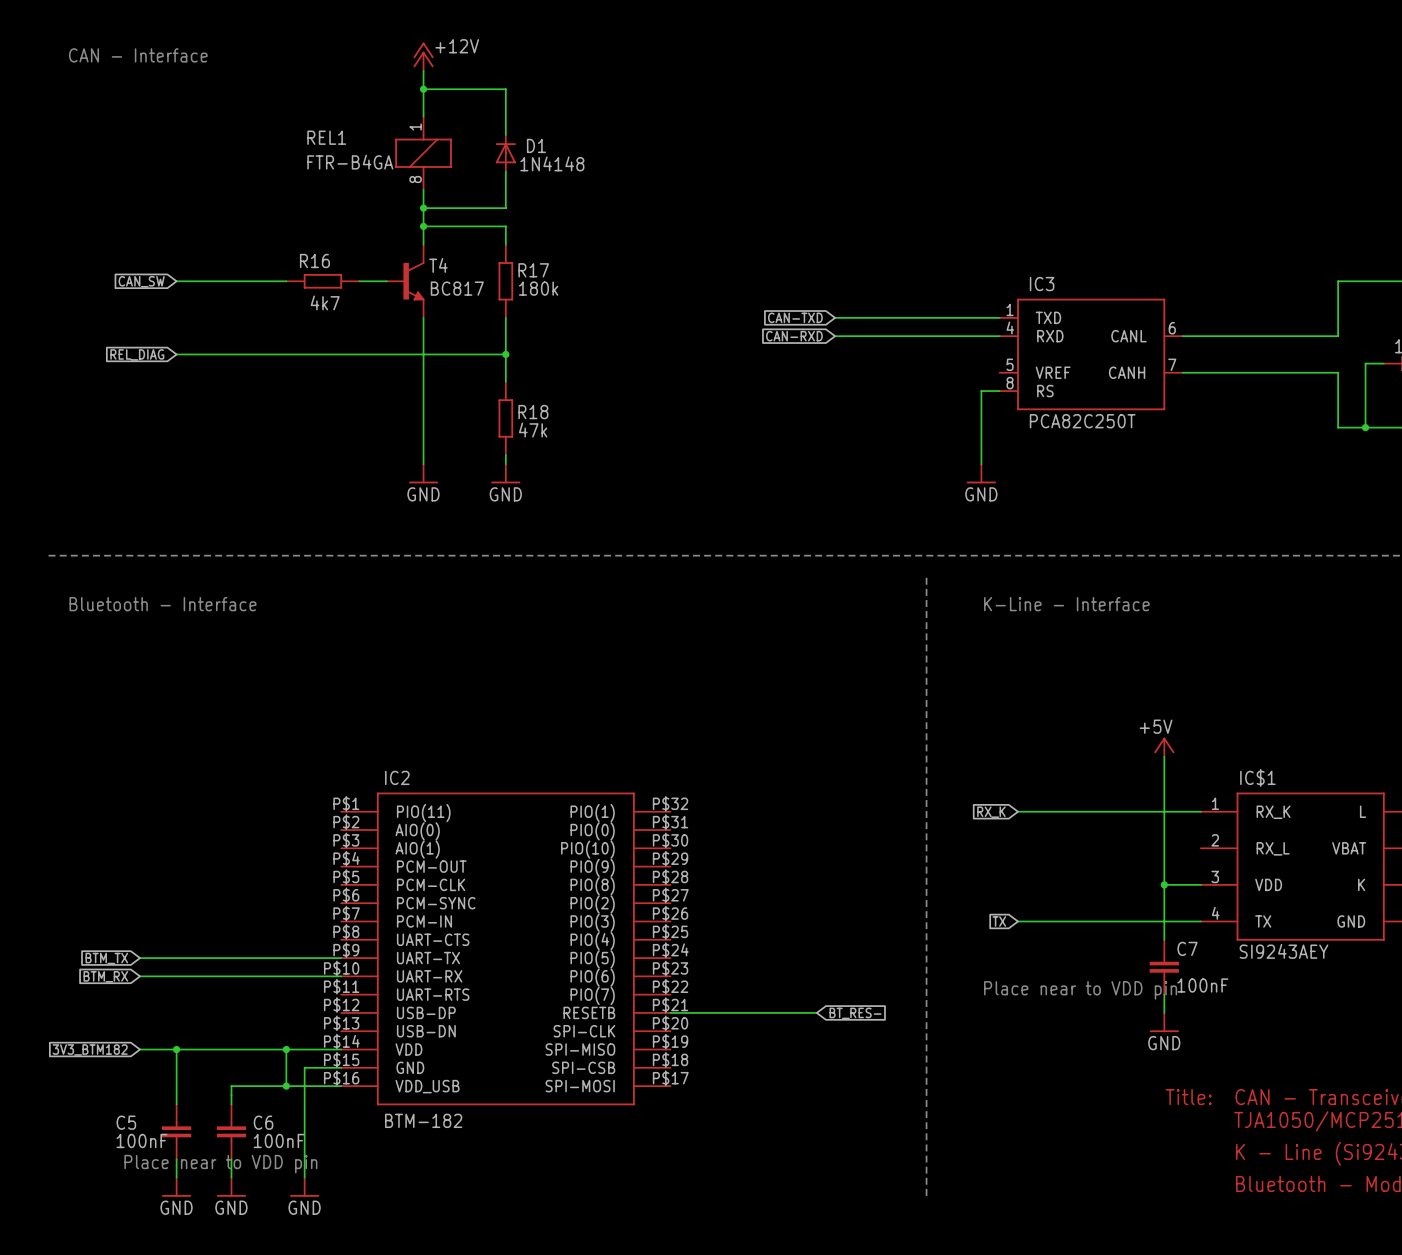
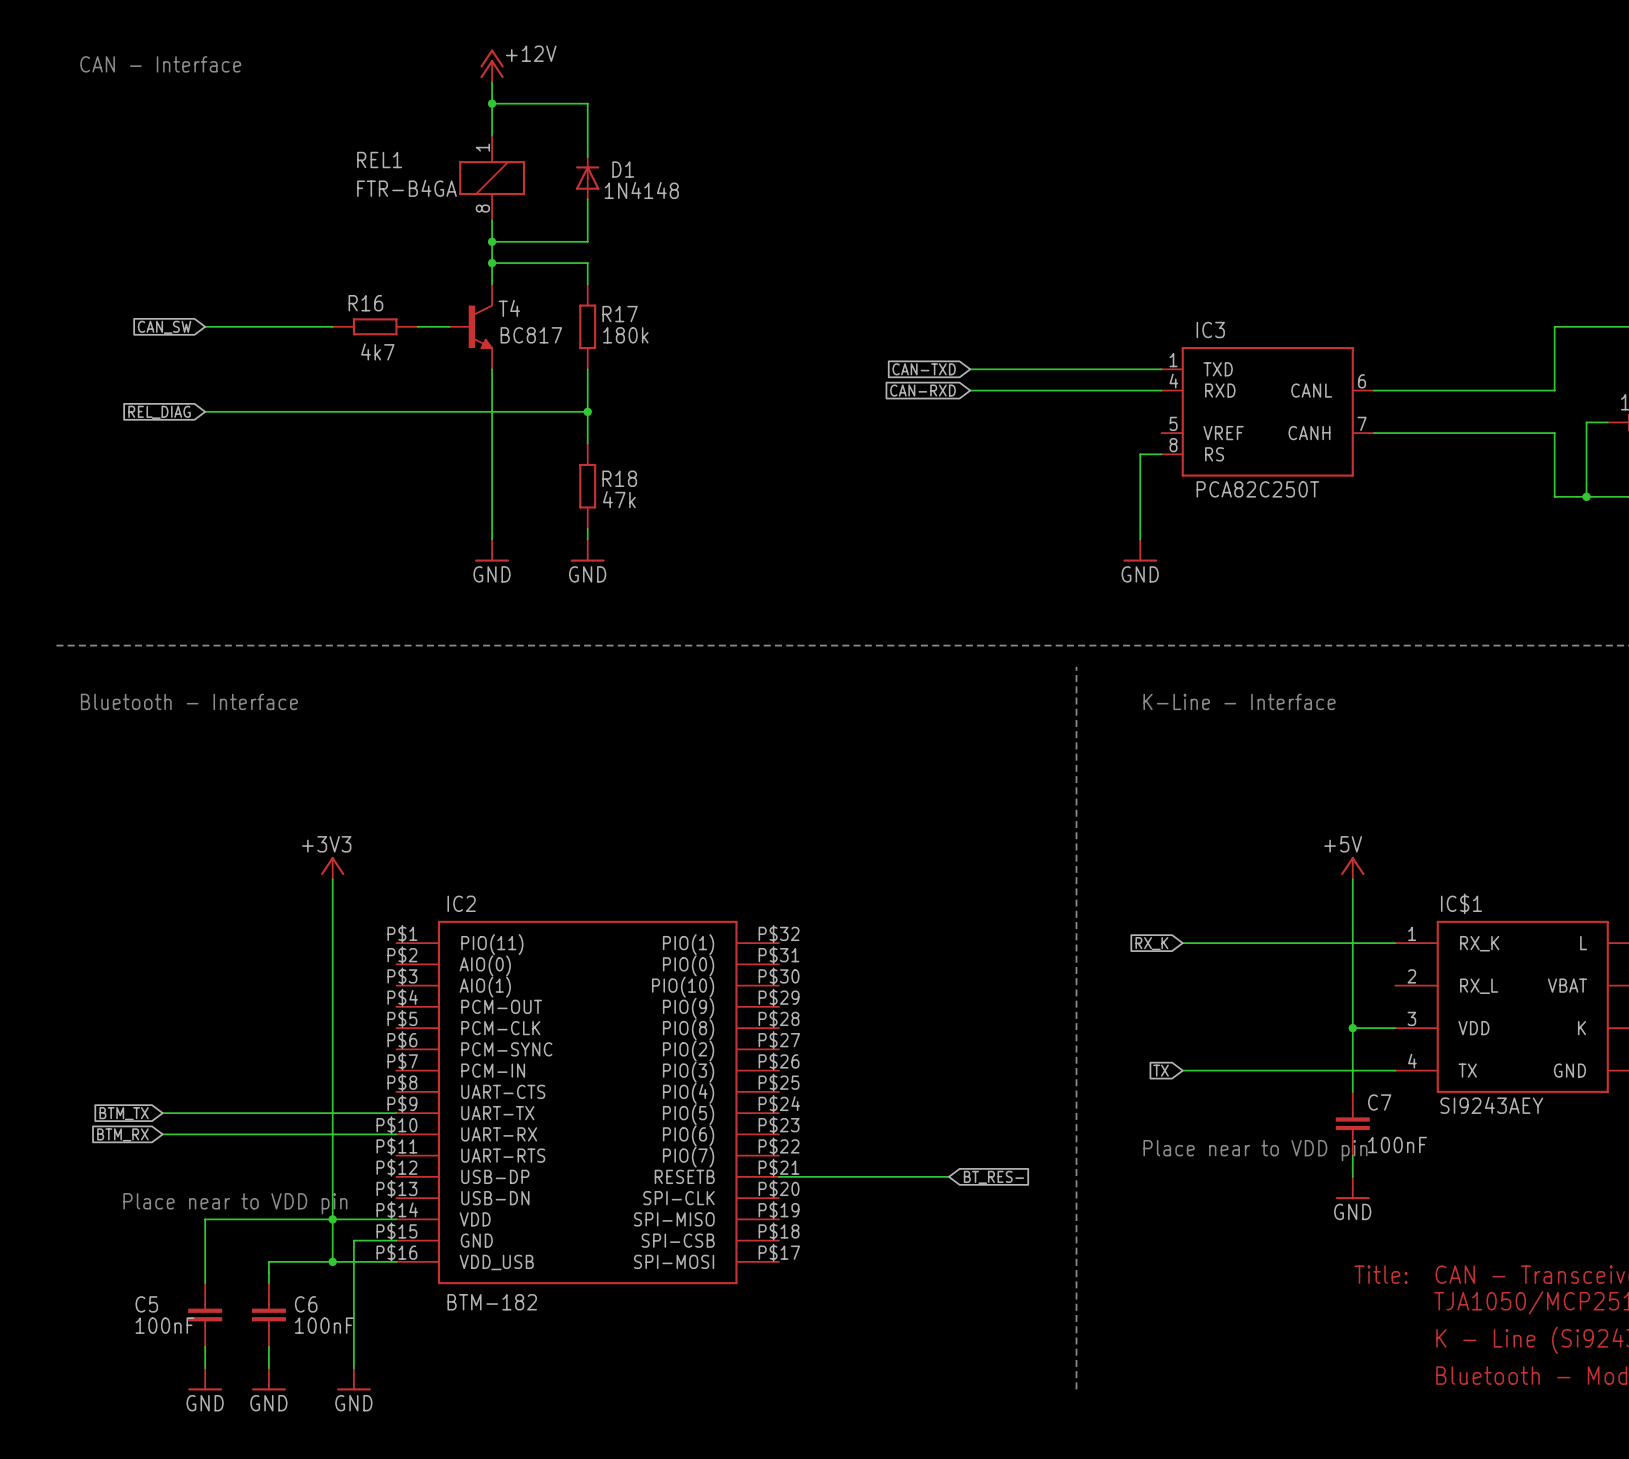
power symbol: none -> +3V3 (332, 868)
wire: none -> (332, 879) (332, 1219)
global label: 3V3_BTM182 (90, 1049) -> none
wire: (140, 1049) (176, 1049) -> none
junction: (176, 1049) -> none
text position: Place near to VDD pin (220, 1164) -> Place near to VDD pin (235, 1203)

